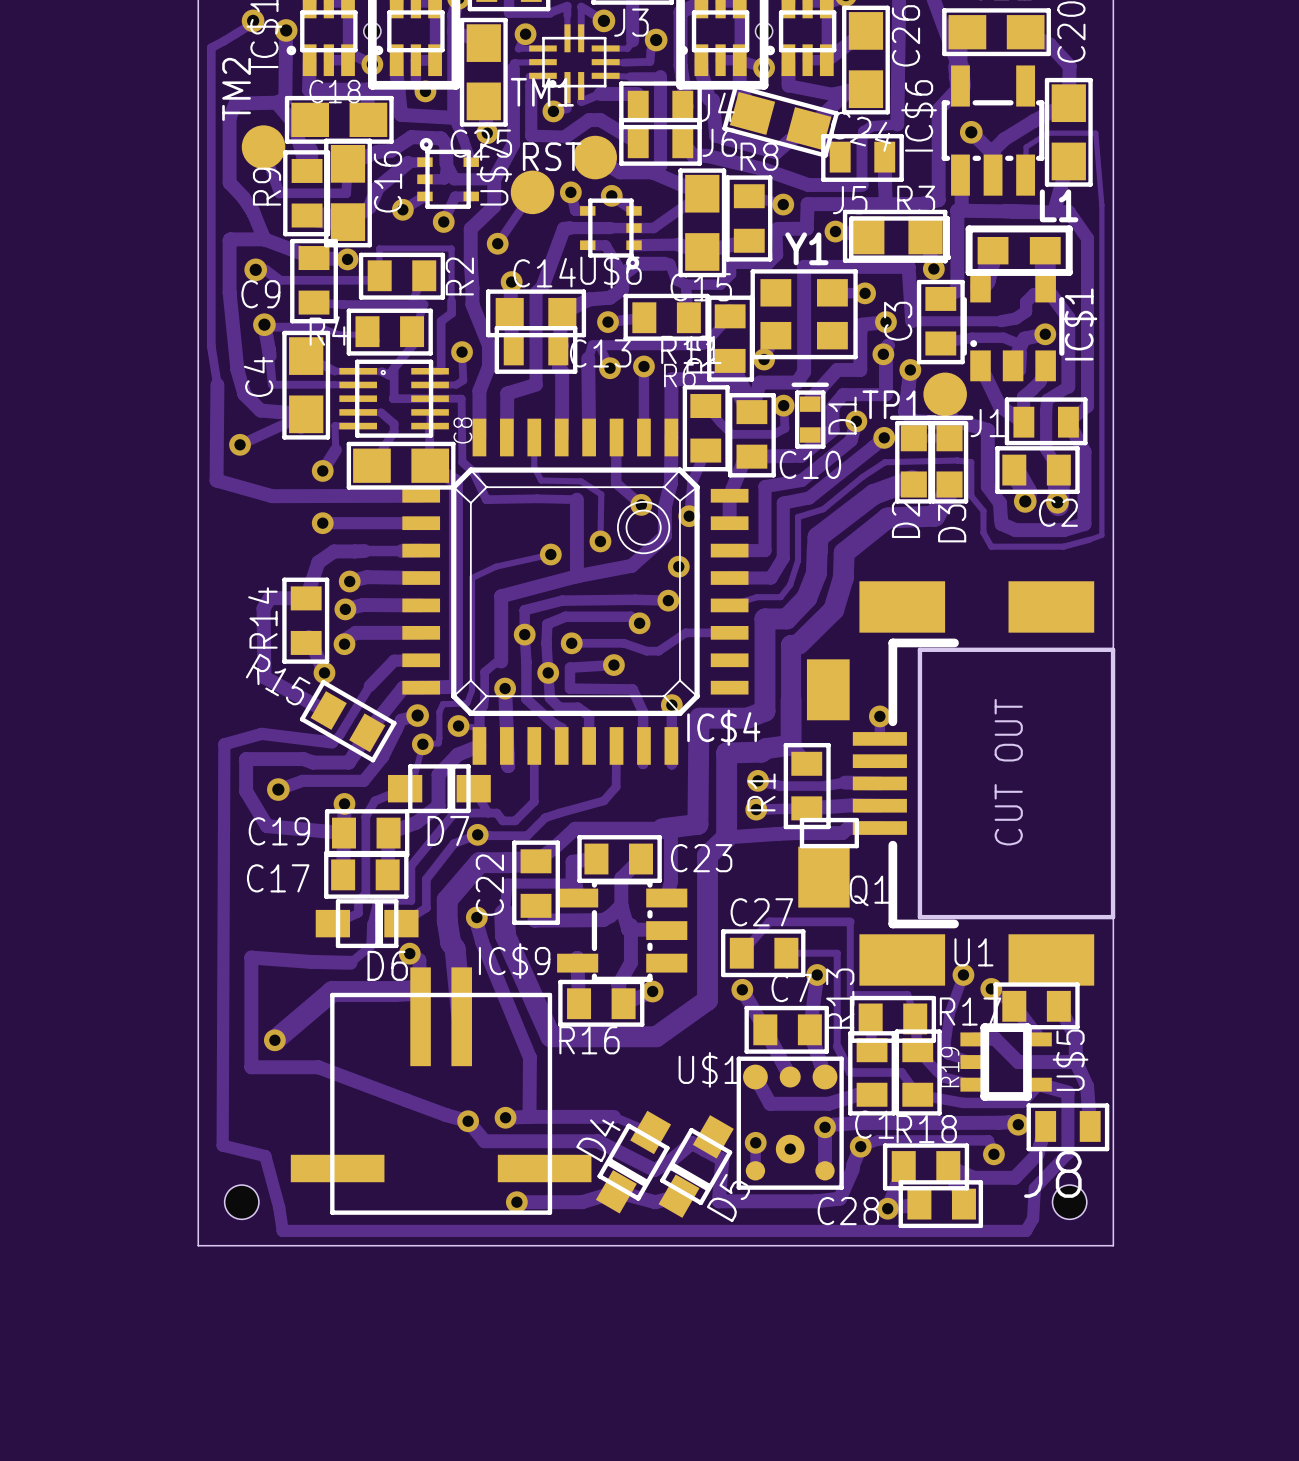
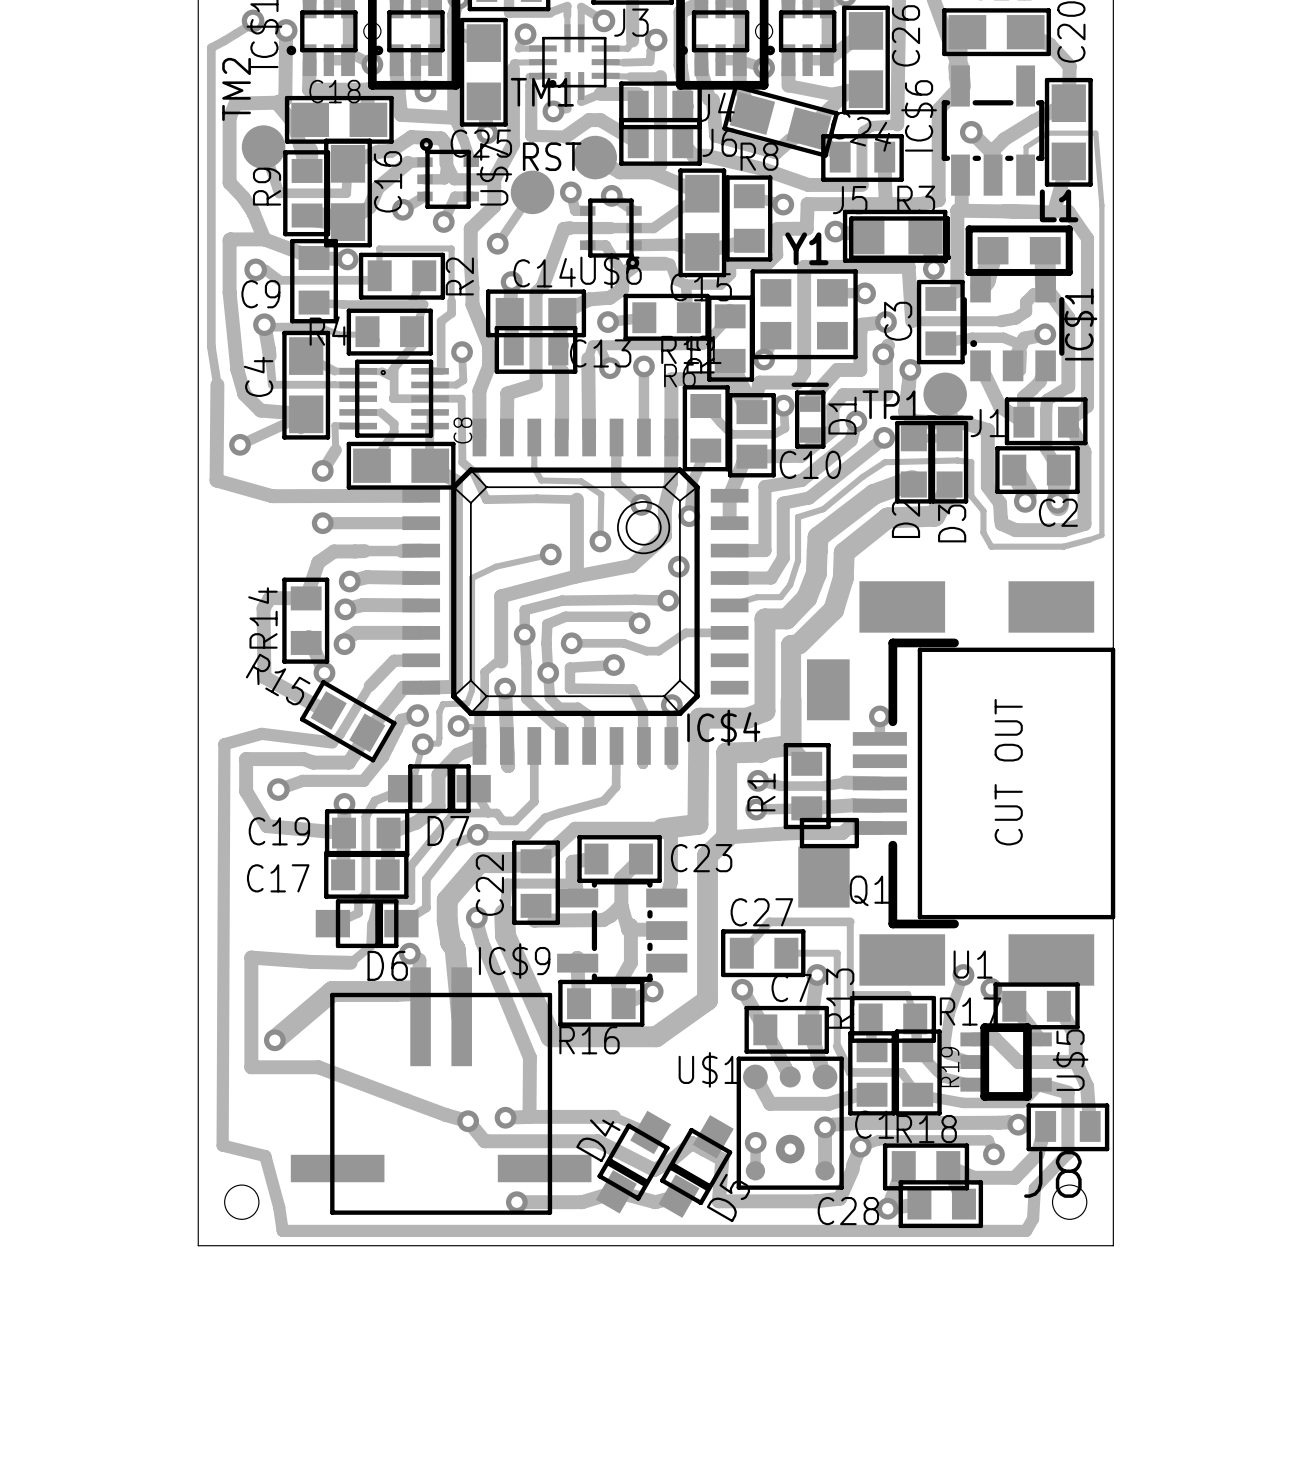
U1 name position: U1 (973, 952) -> U1 (973, 964)

